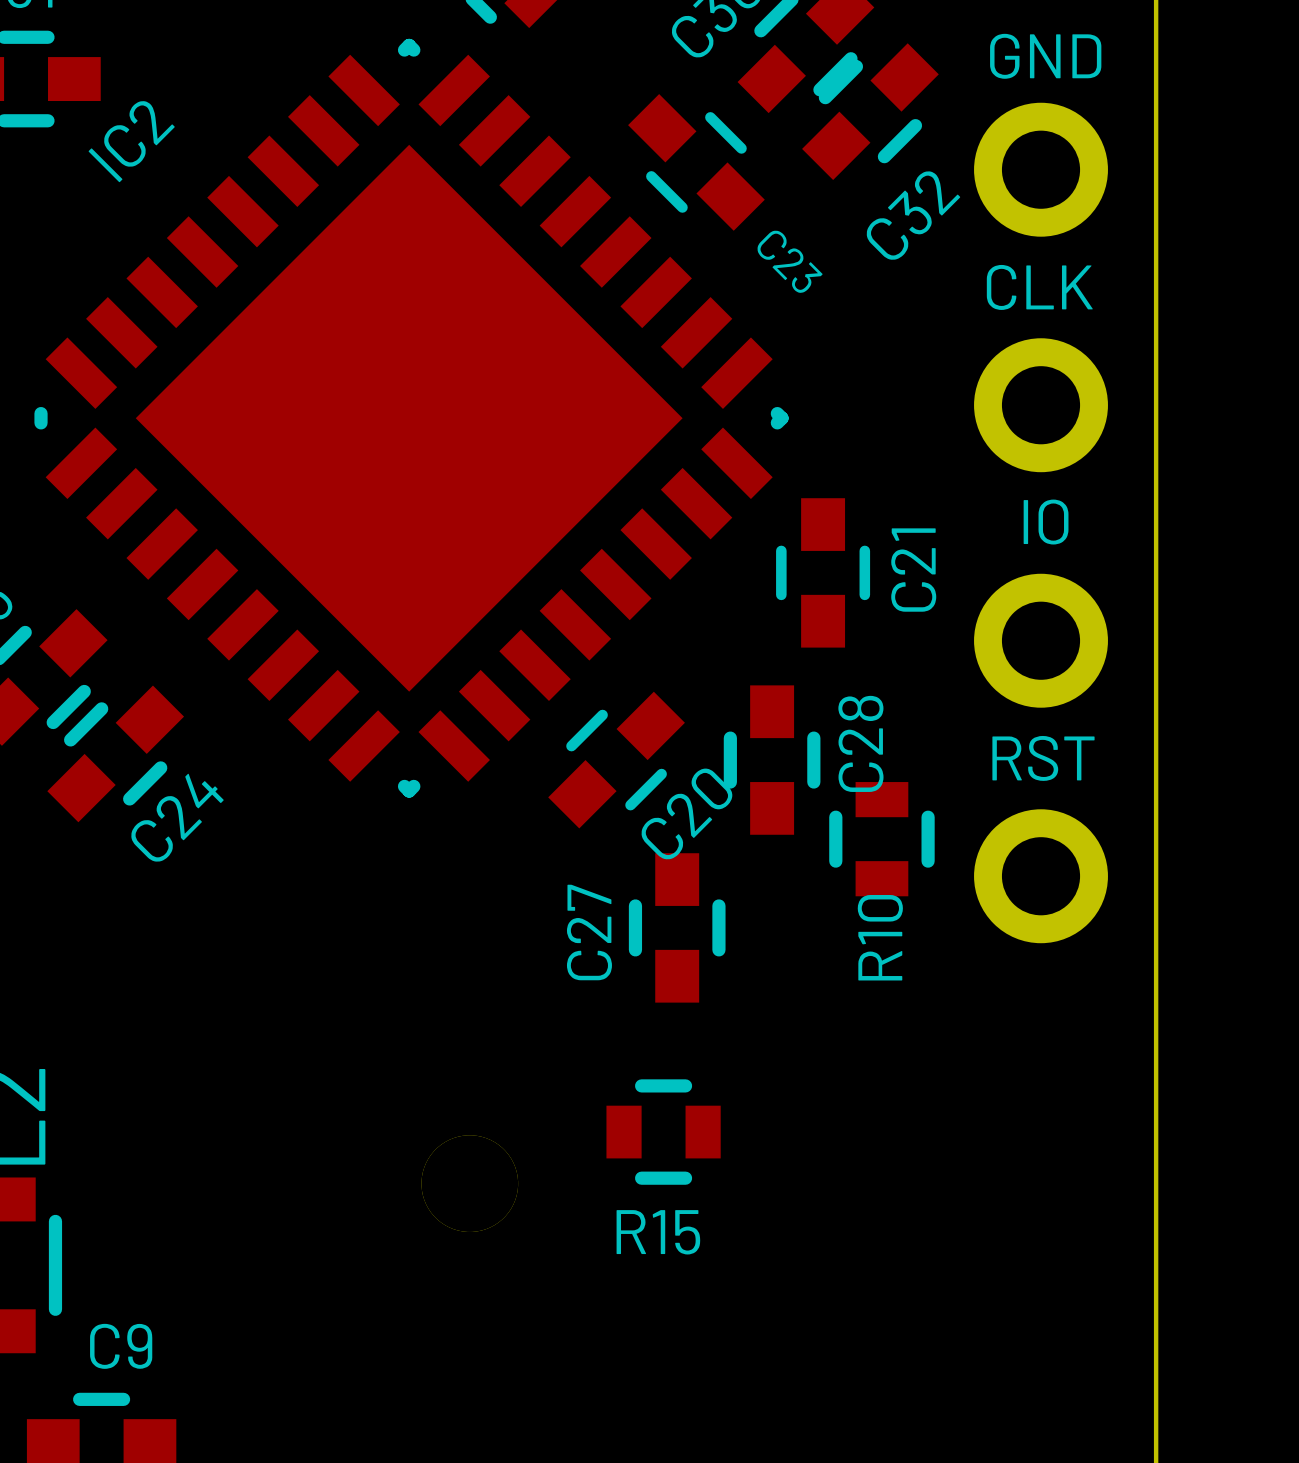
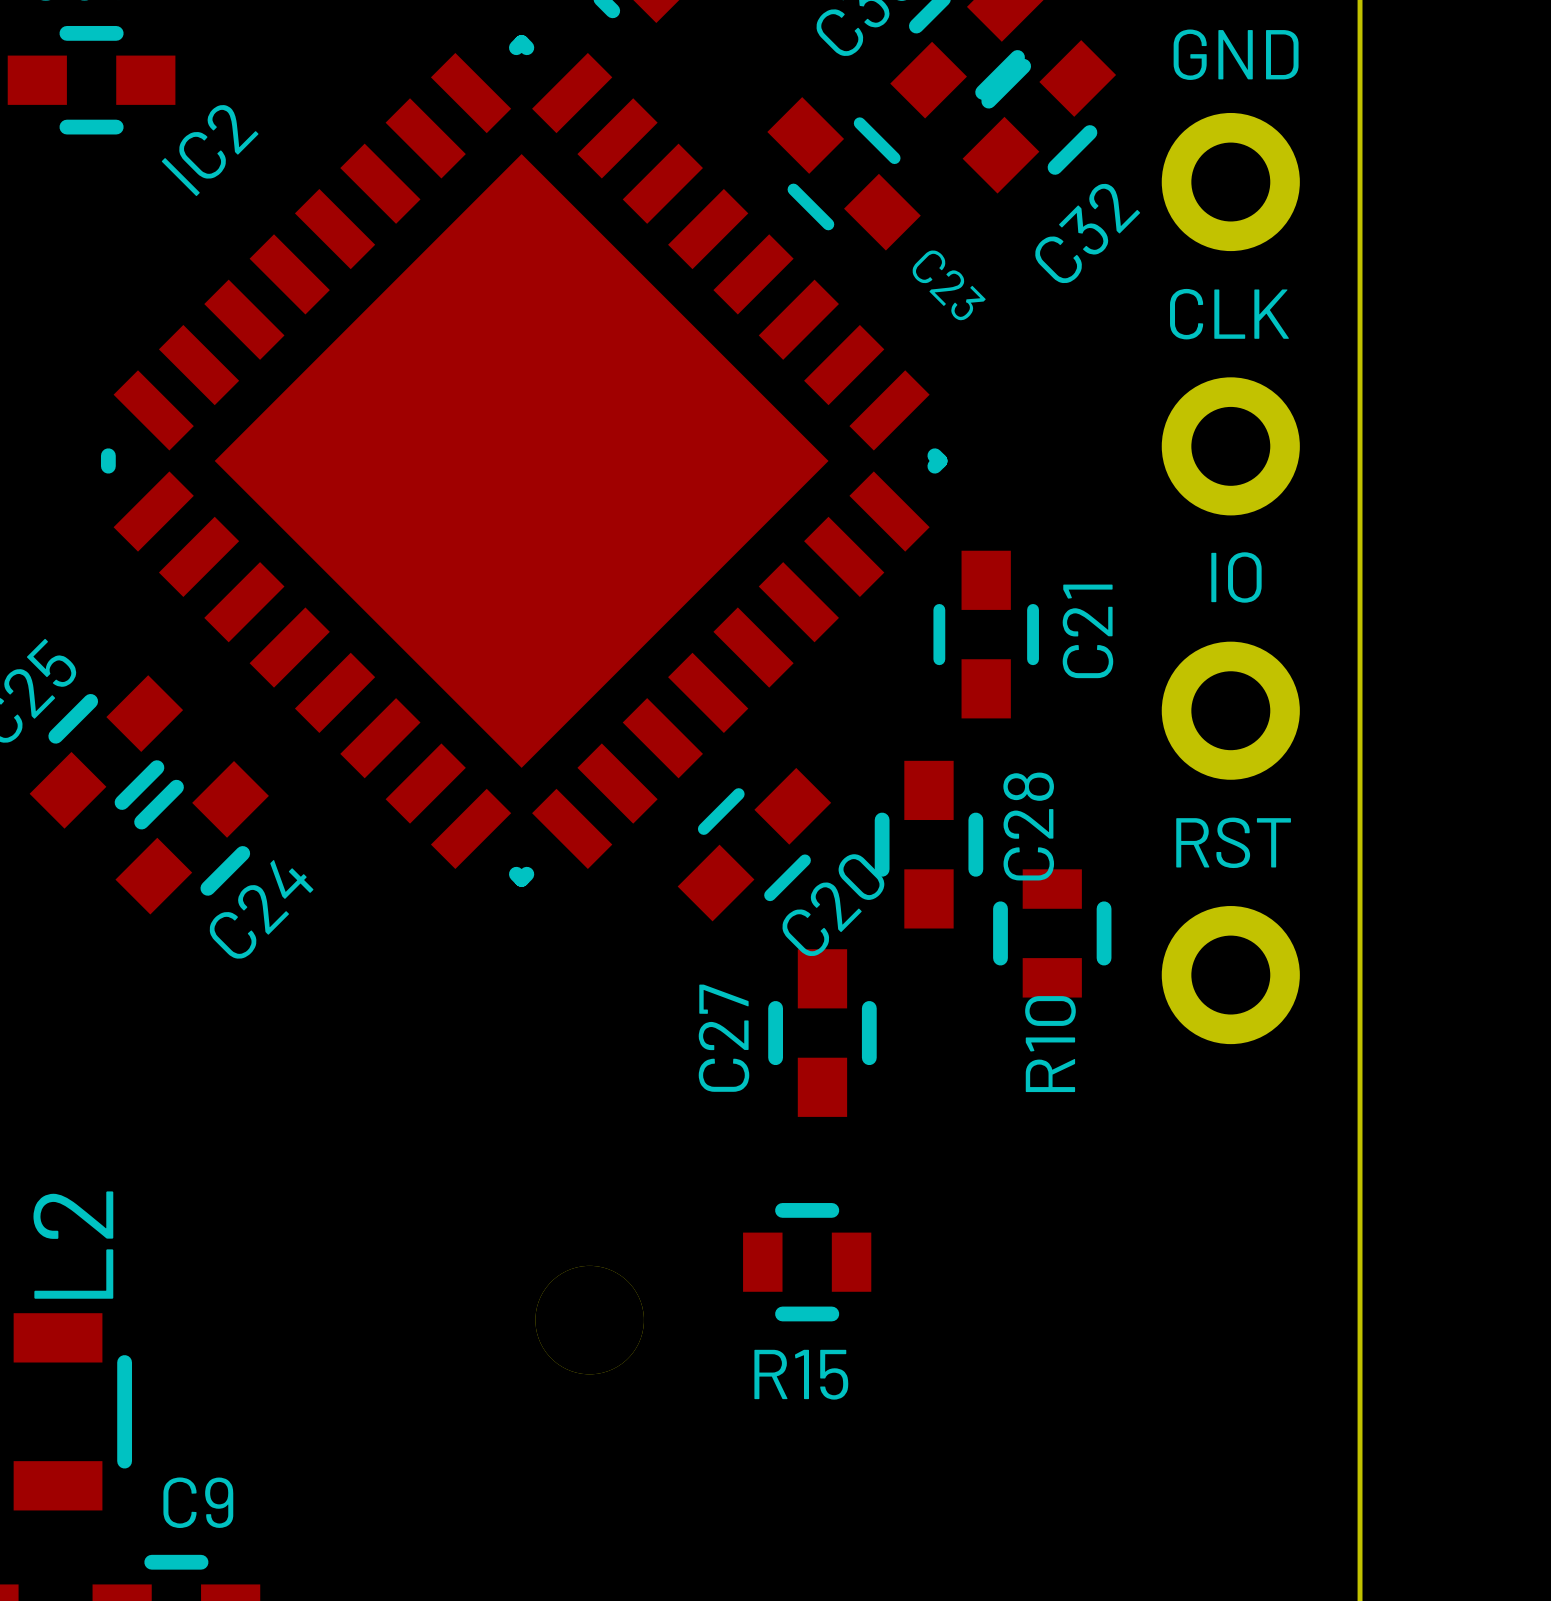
part footprint: [974, 102, 1108, 944] -> [1161, 112, 1300, 1045]

